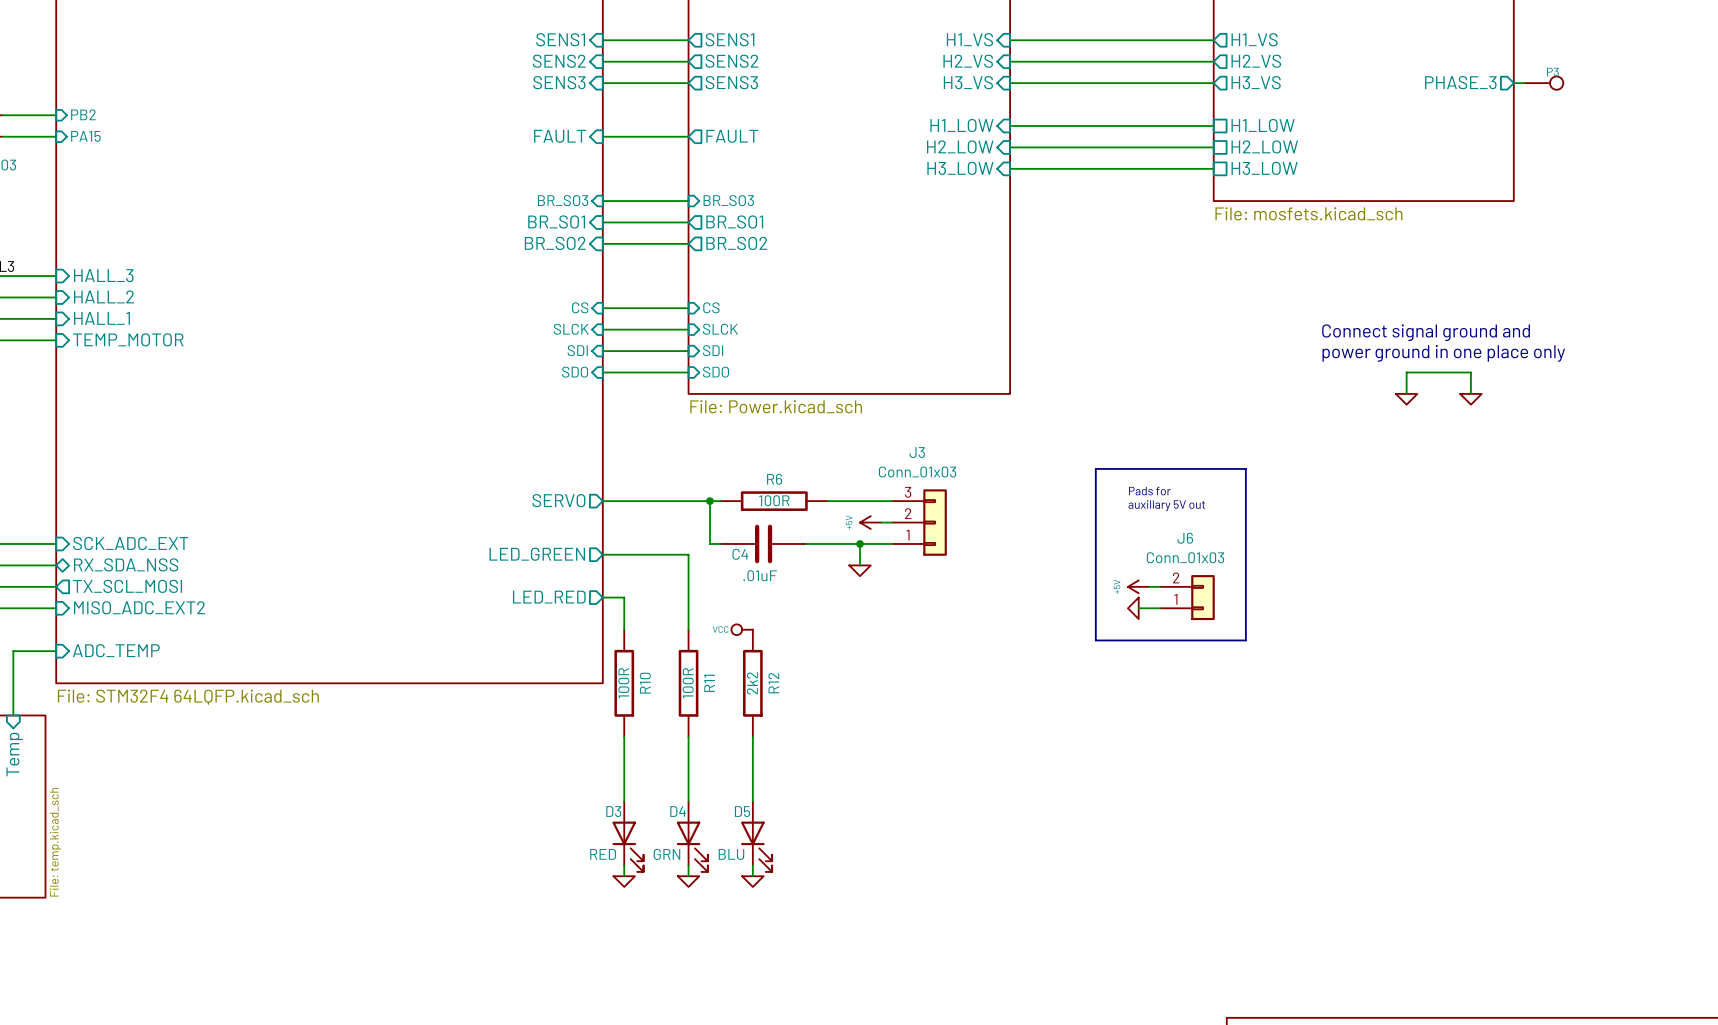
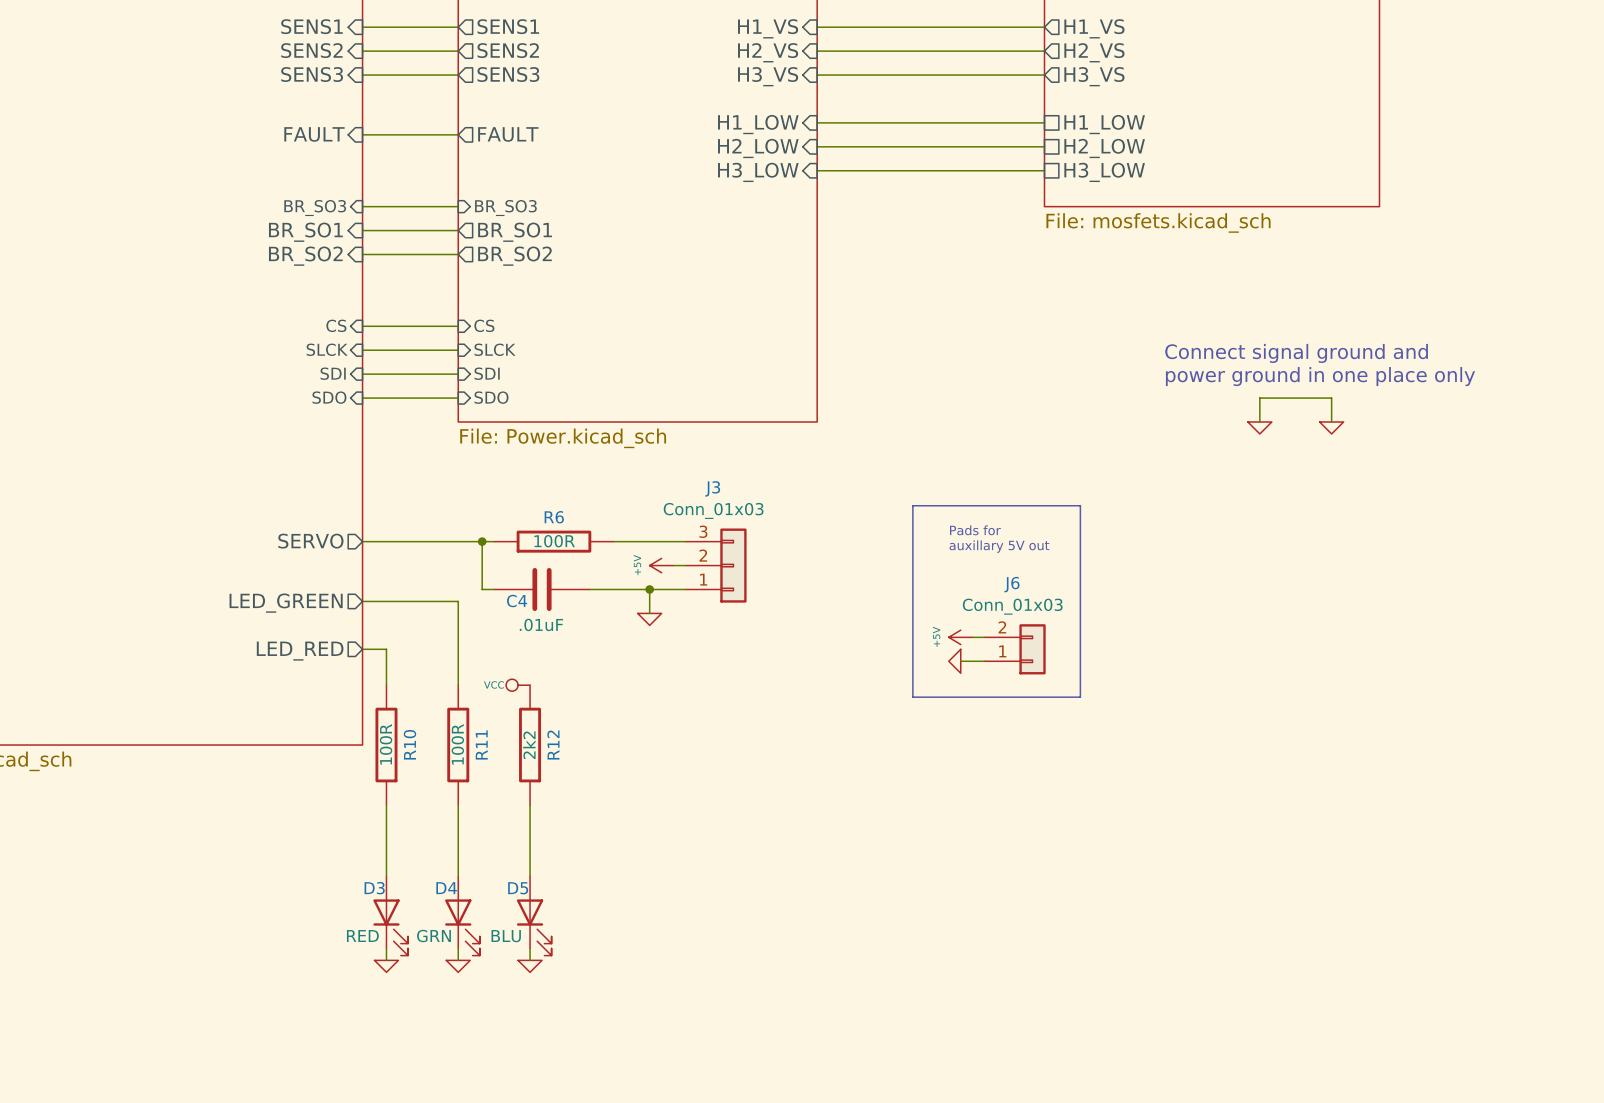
sheet pin: PHASE_3 (1460, 82) -> none
wire: (1513, 83) (1524, 83) -> none
P3: (1543, 83) -> none

